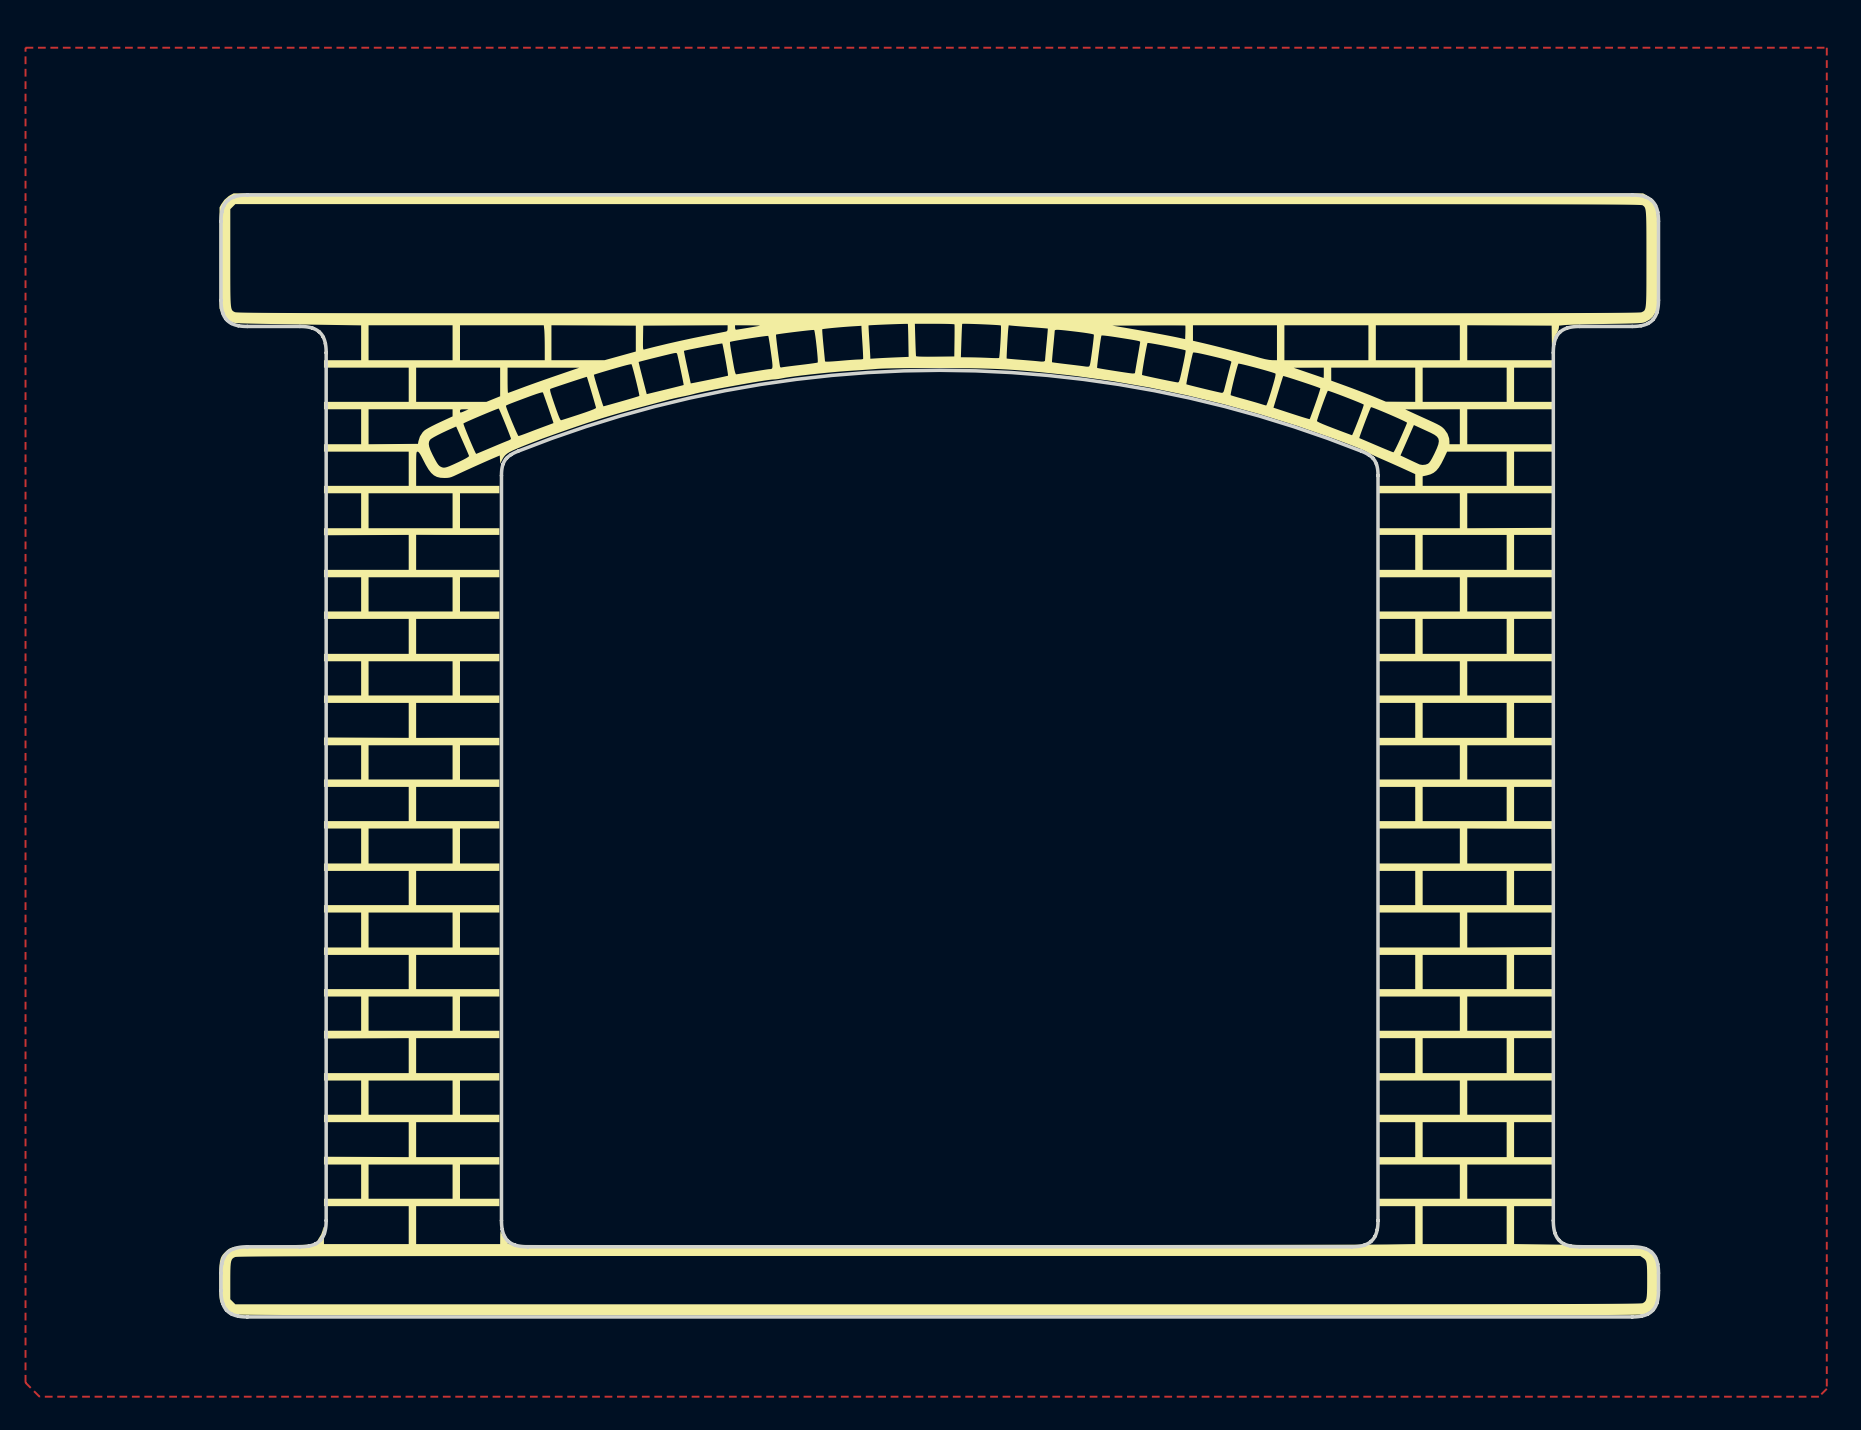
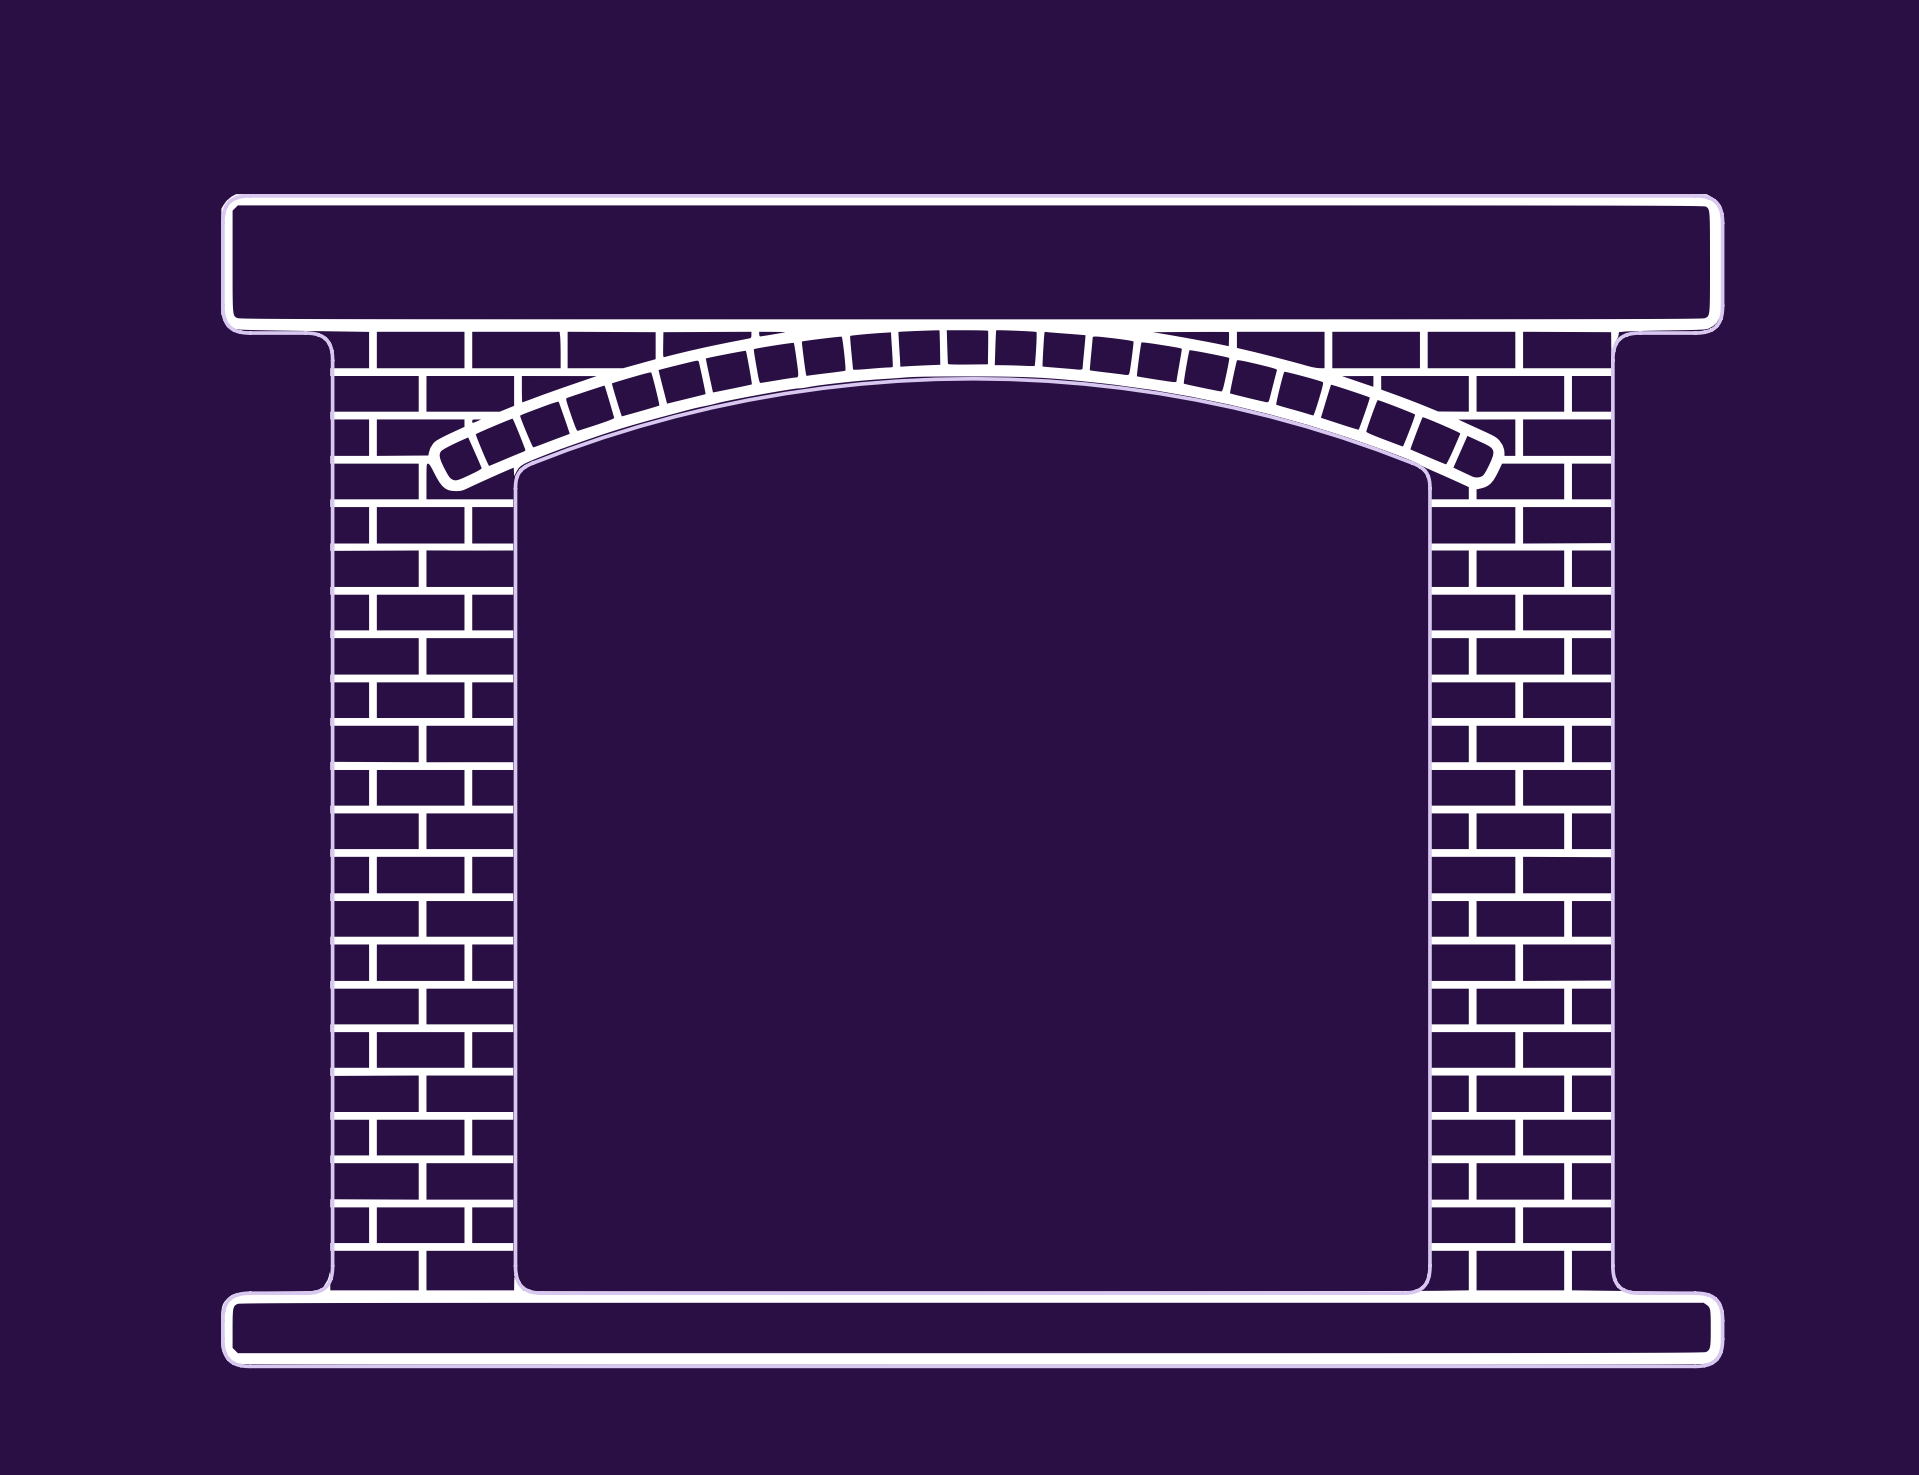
zone outline: (25, 47) (25, 1382) (39, 1396) (1818, 1396) (1826, 1388) (1826, 47) (25, 47) -> none

